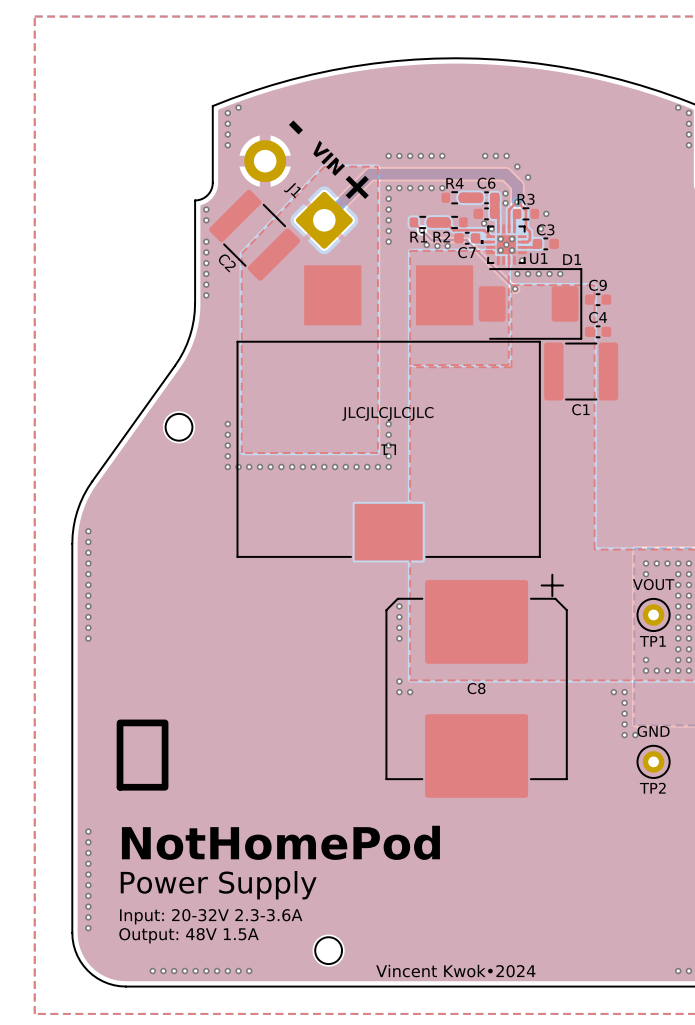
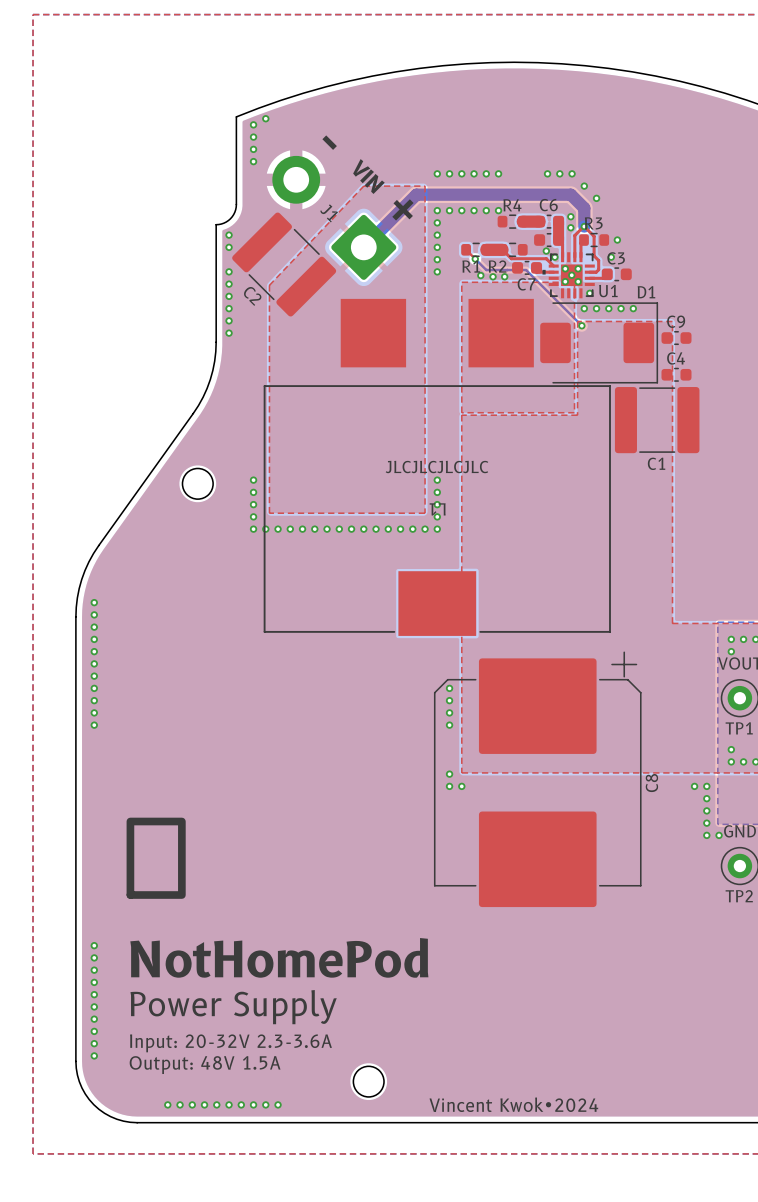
C8 name rotation: 0° (476, 688) -> 90° counterclockwise (651, 783)
C8 name position: C8 (476, 688) -> C8 (651, 783)

